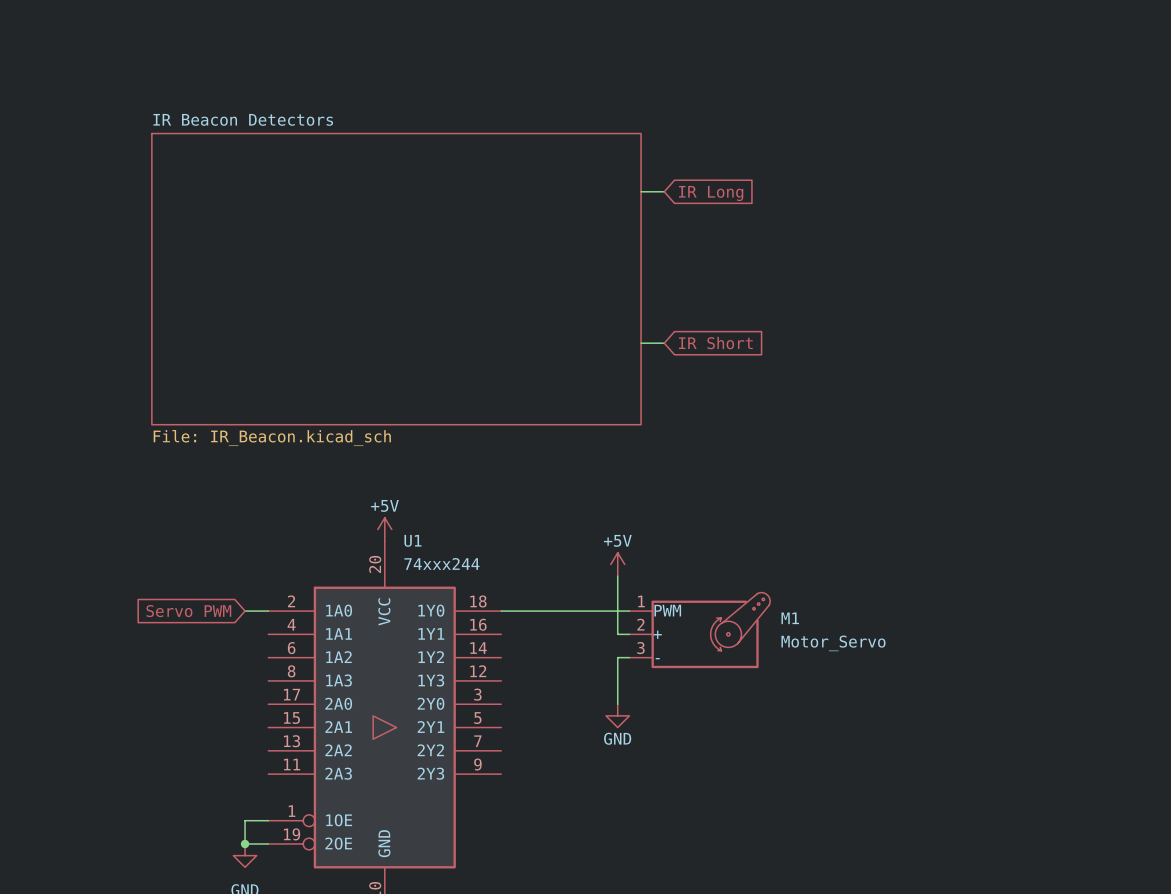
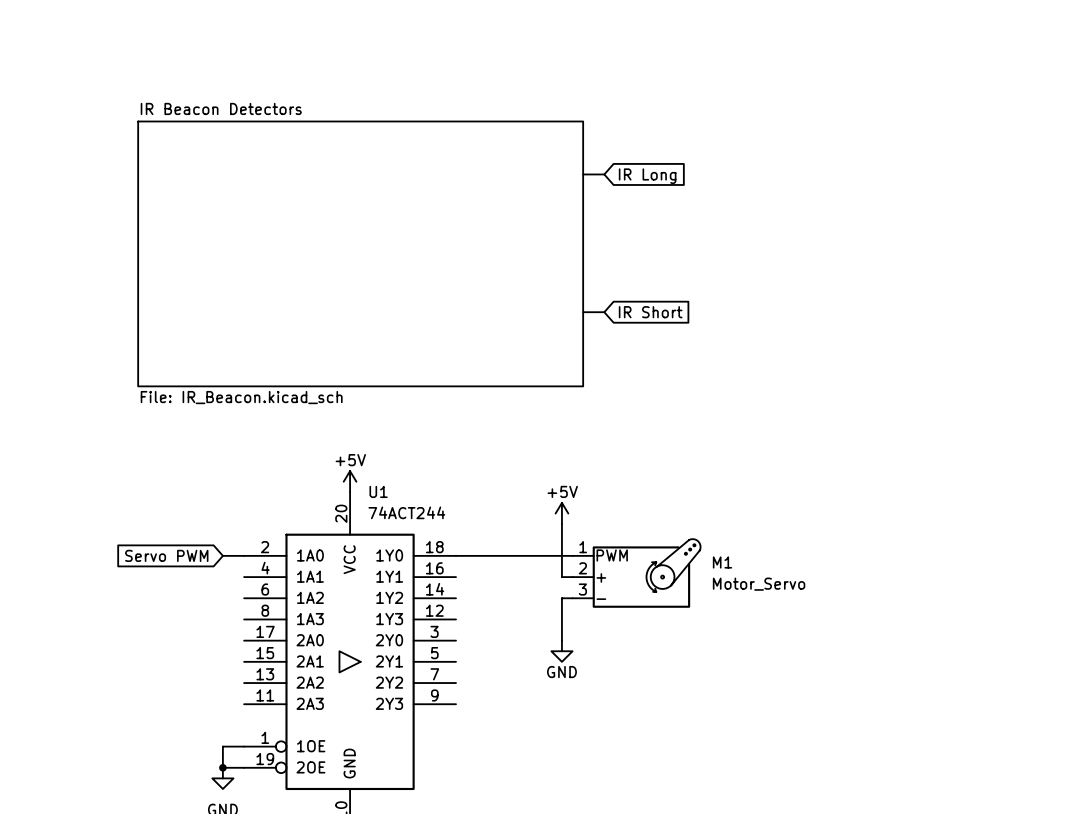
U1 value: 74xxx244 (441, 563) -> 74ACT244 (406, 512)

